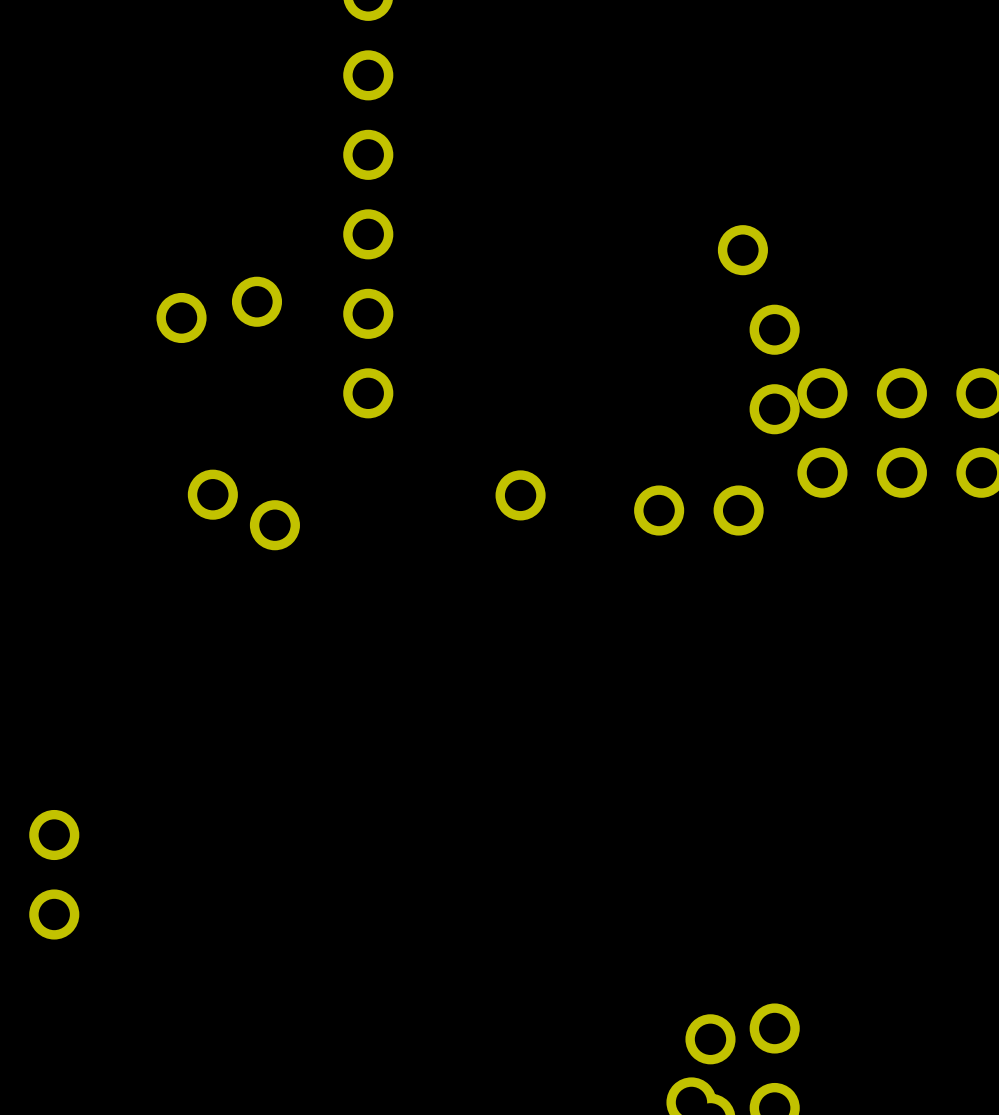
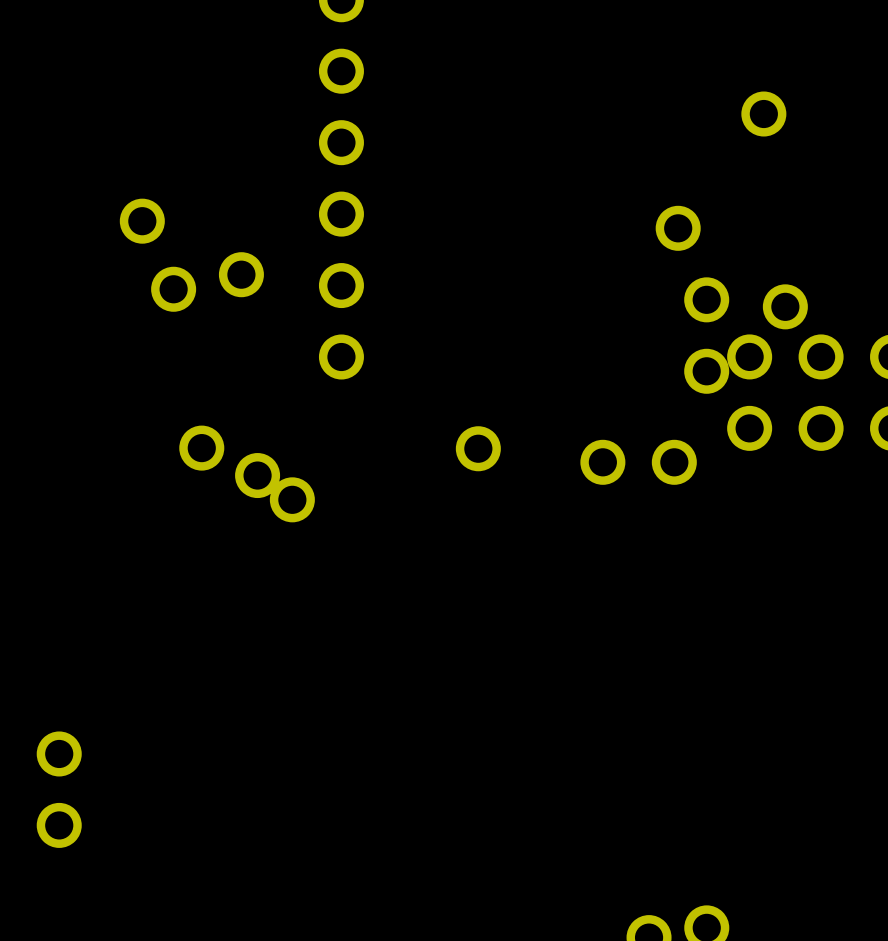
part: none -> (763, 114)
part: none -> (142, 221)
part: none -> (785, 306)
part: none -> (292, 499)

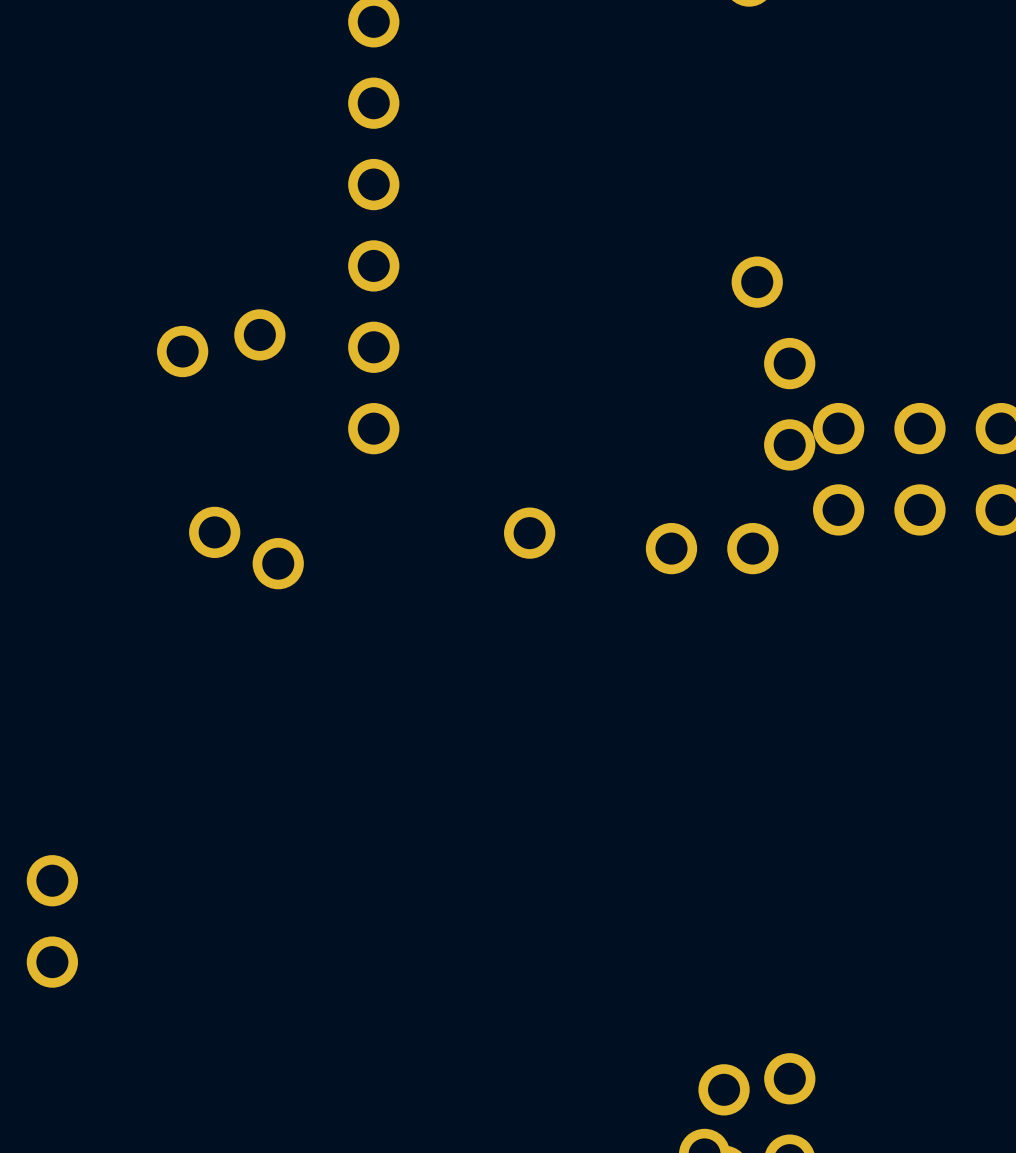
part: (763, 114) -> none
part: (142, 221) -> none
part: (785, 306) -> none
part: (292, 499) -> none

